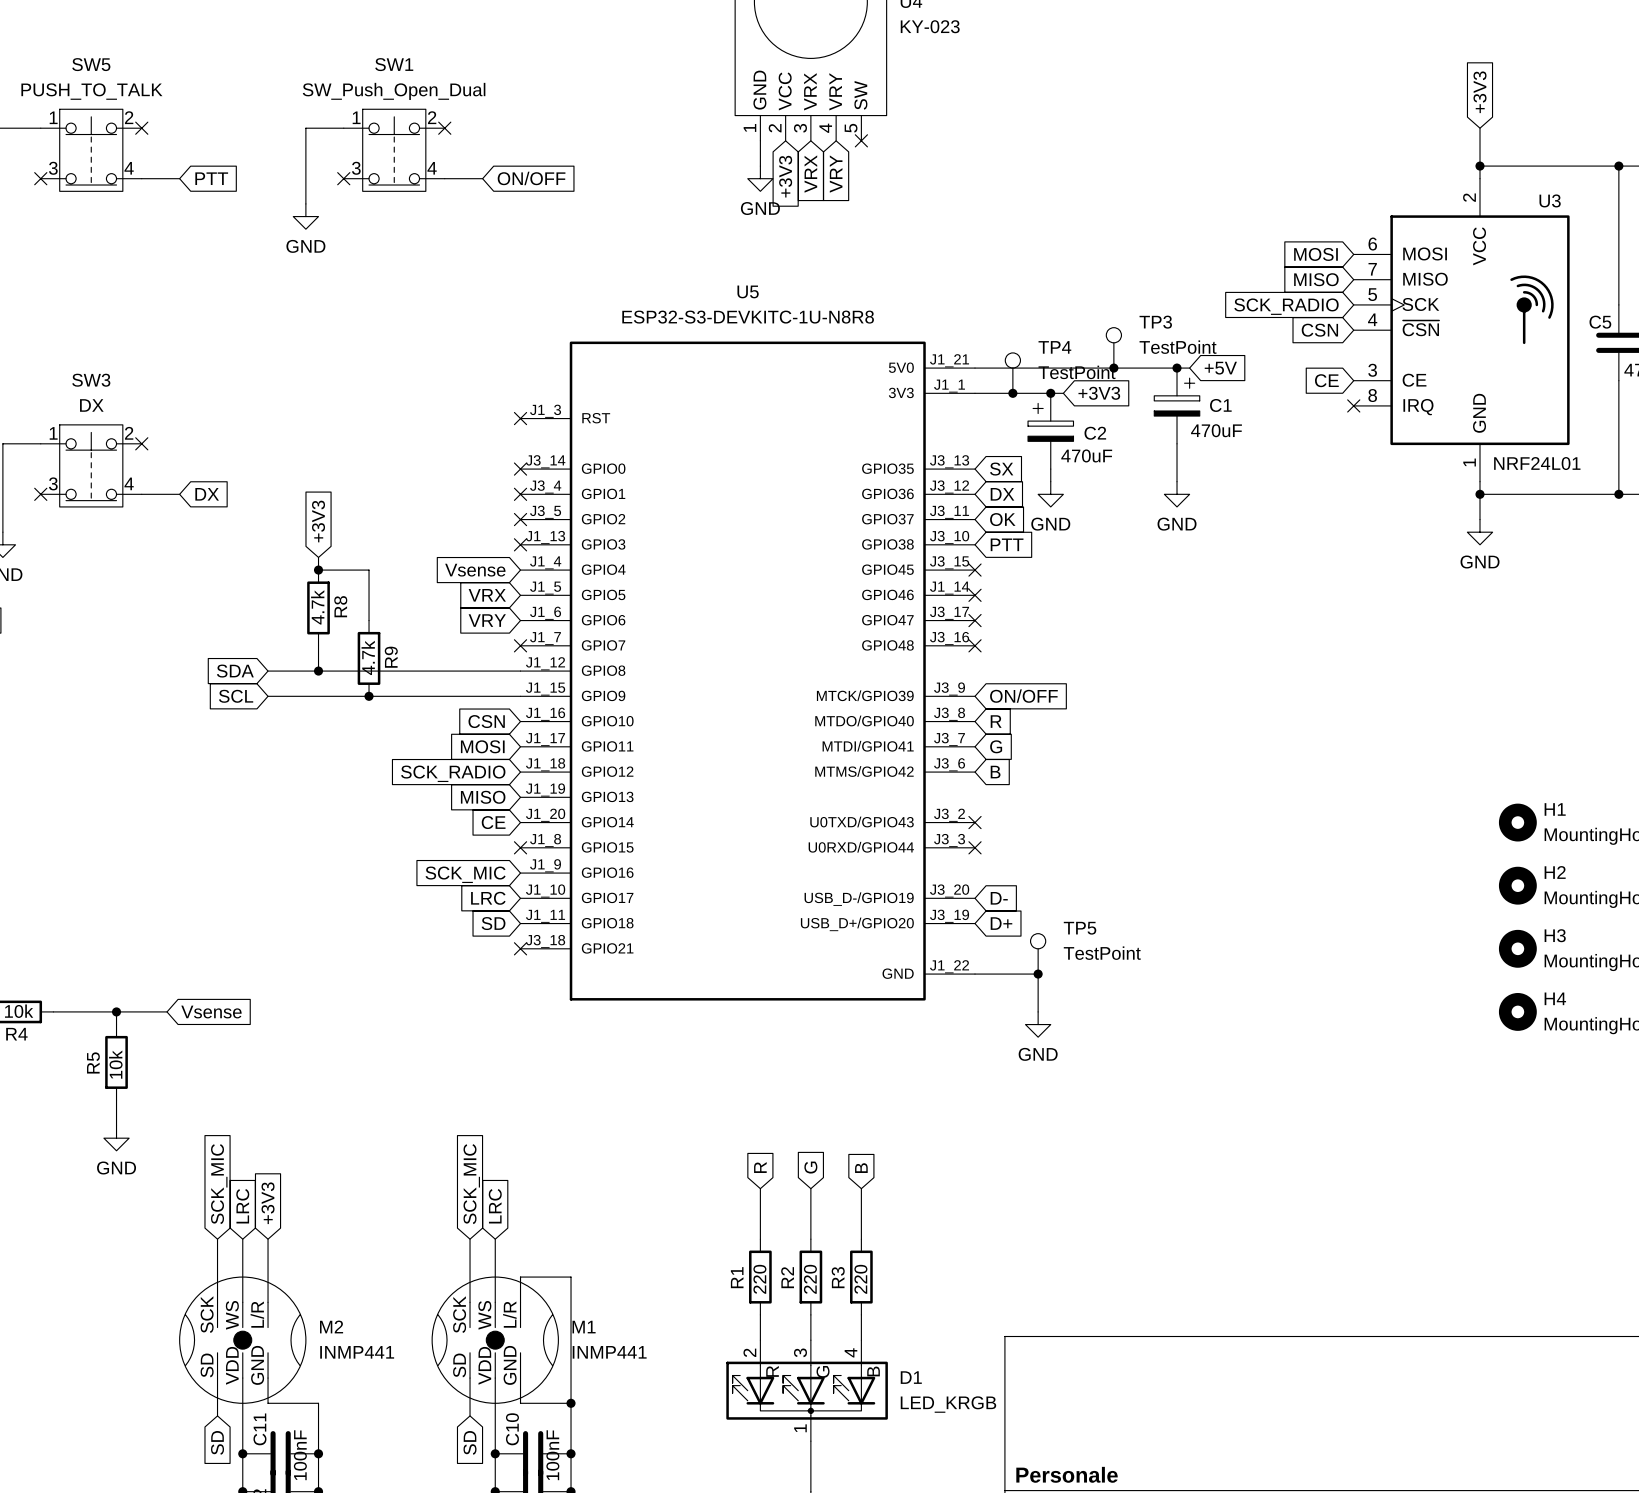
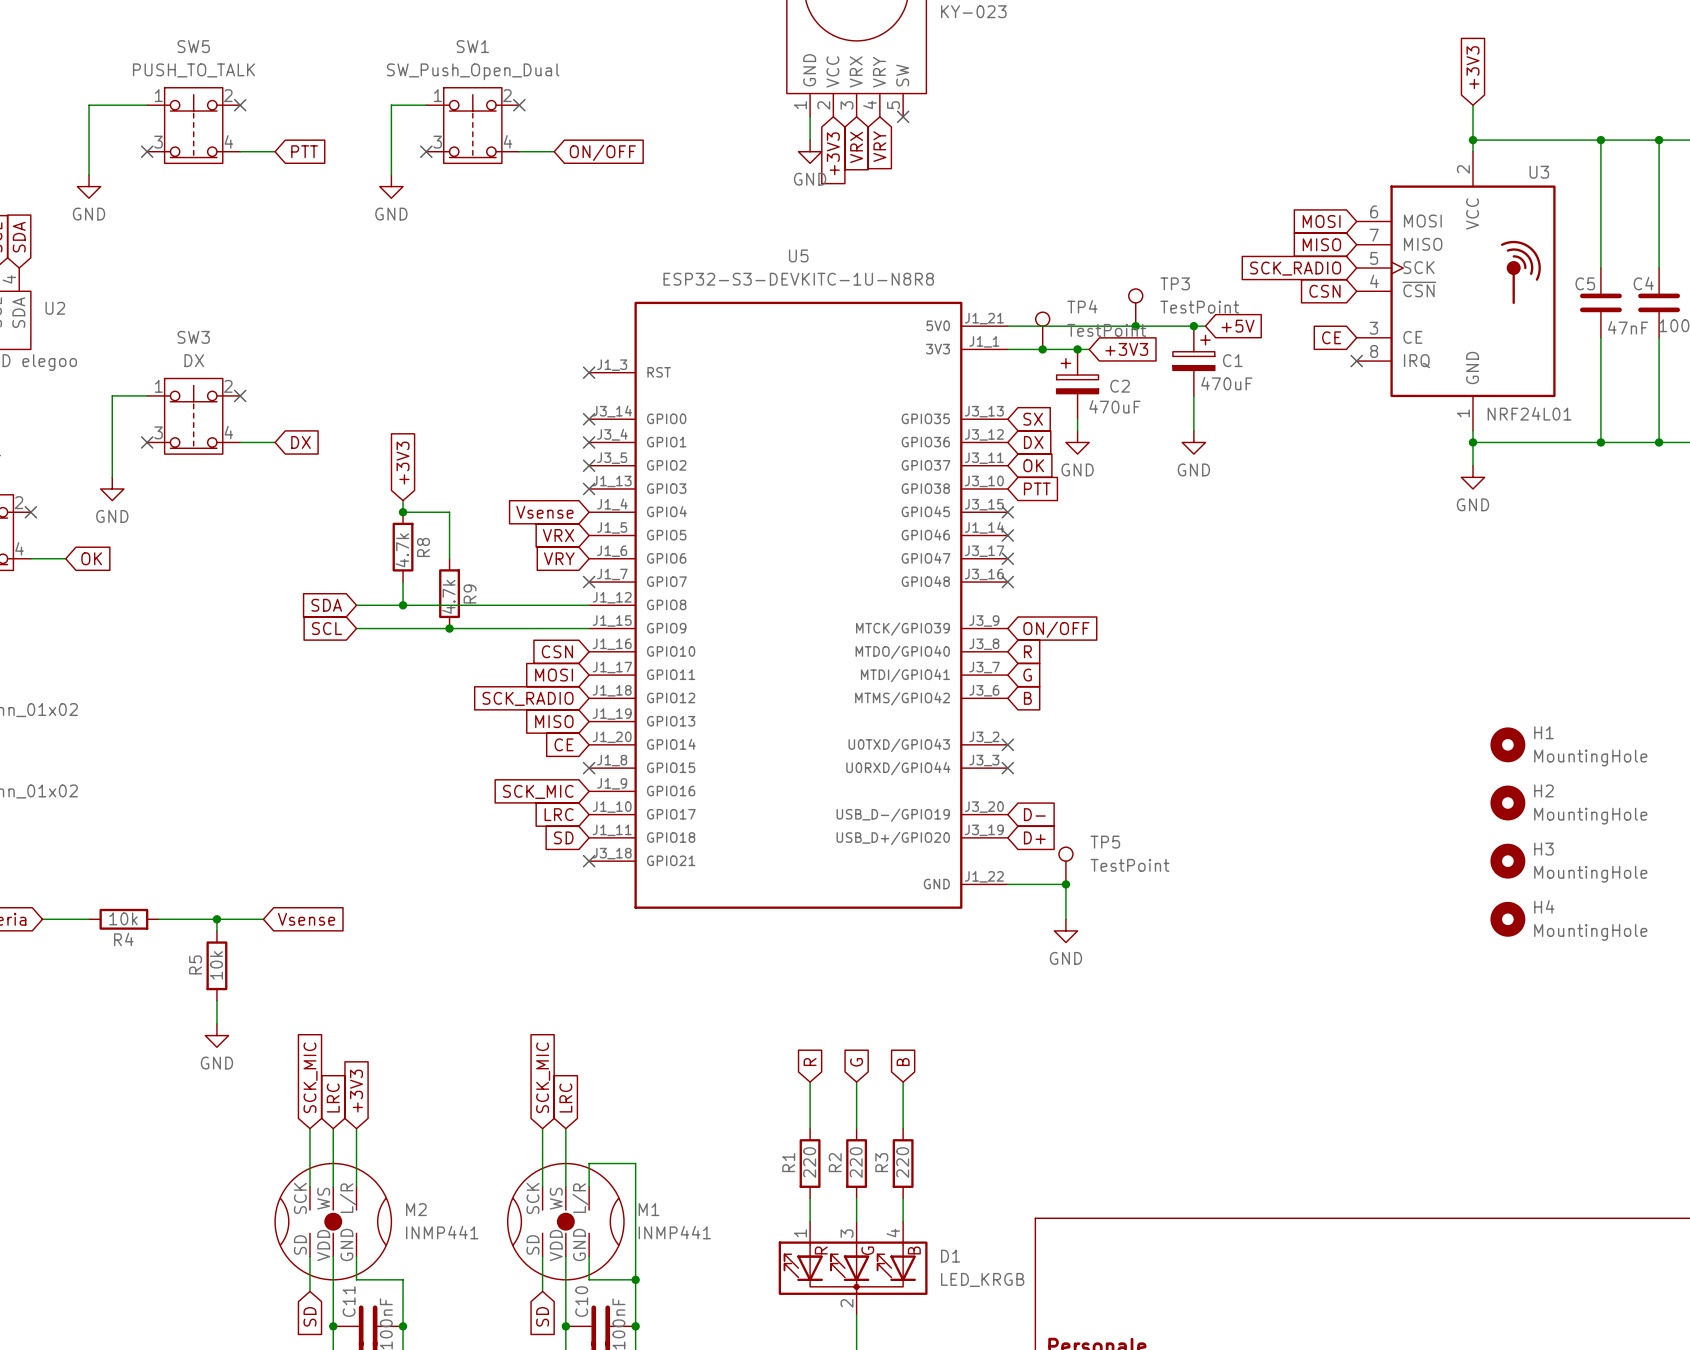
D1 pin number: 2 (749, 1352) -> 1 (800, 1233)
D1 pin number: 1 (800, 1428) -> 2 (847, 1303)

